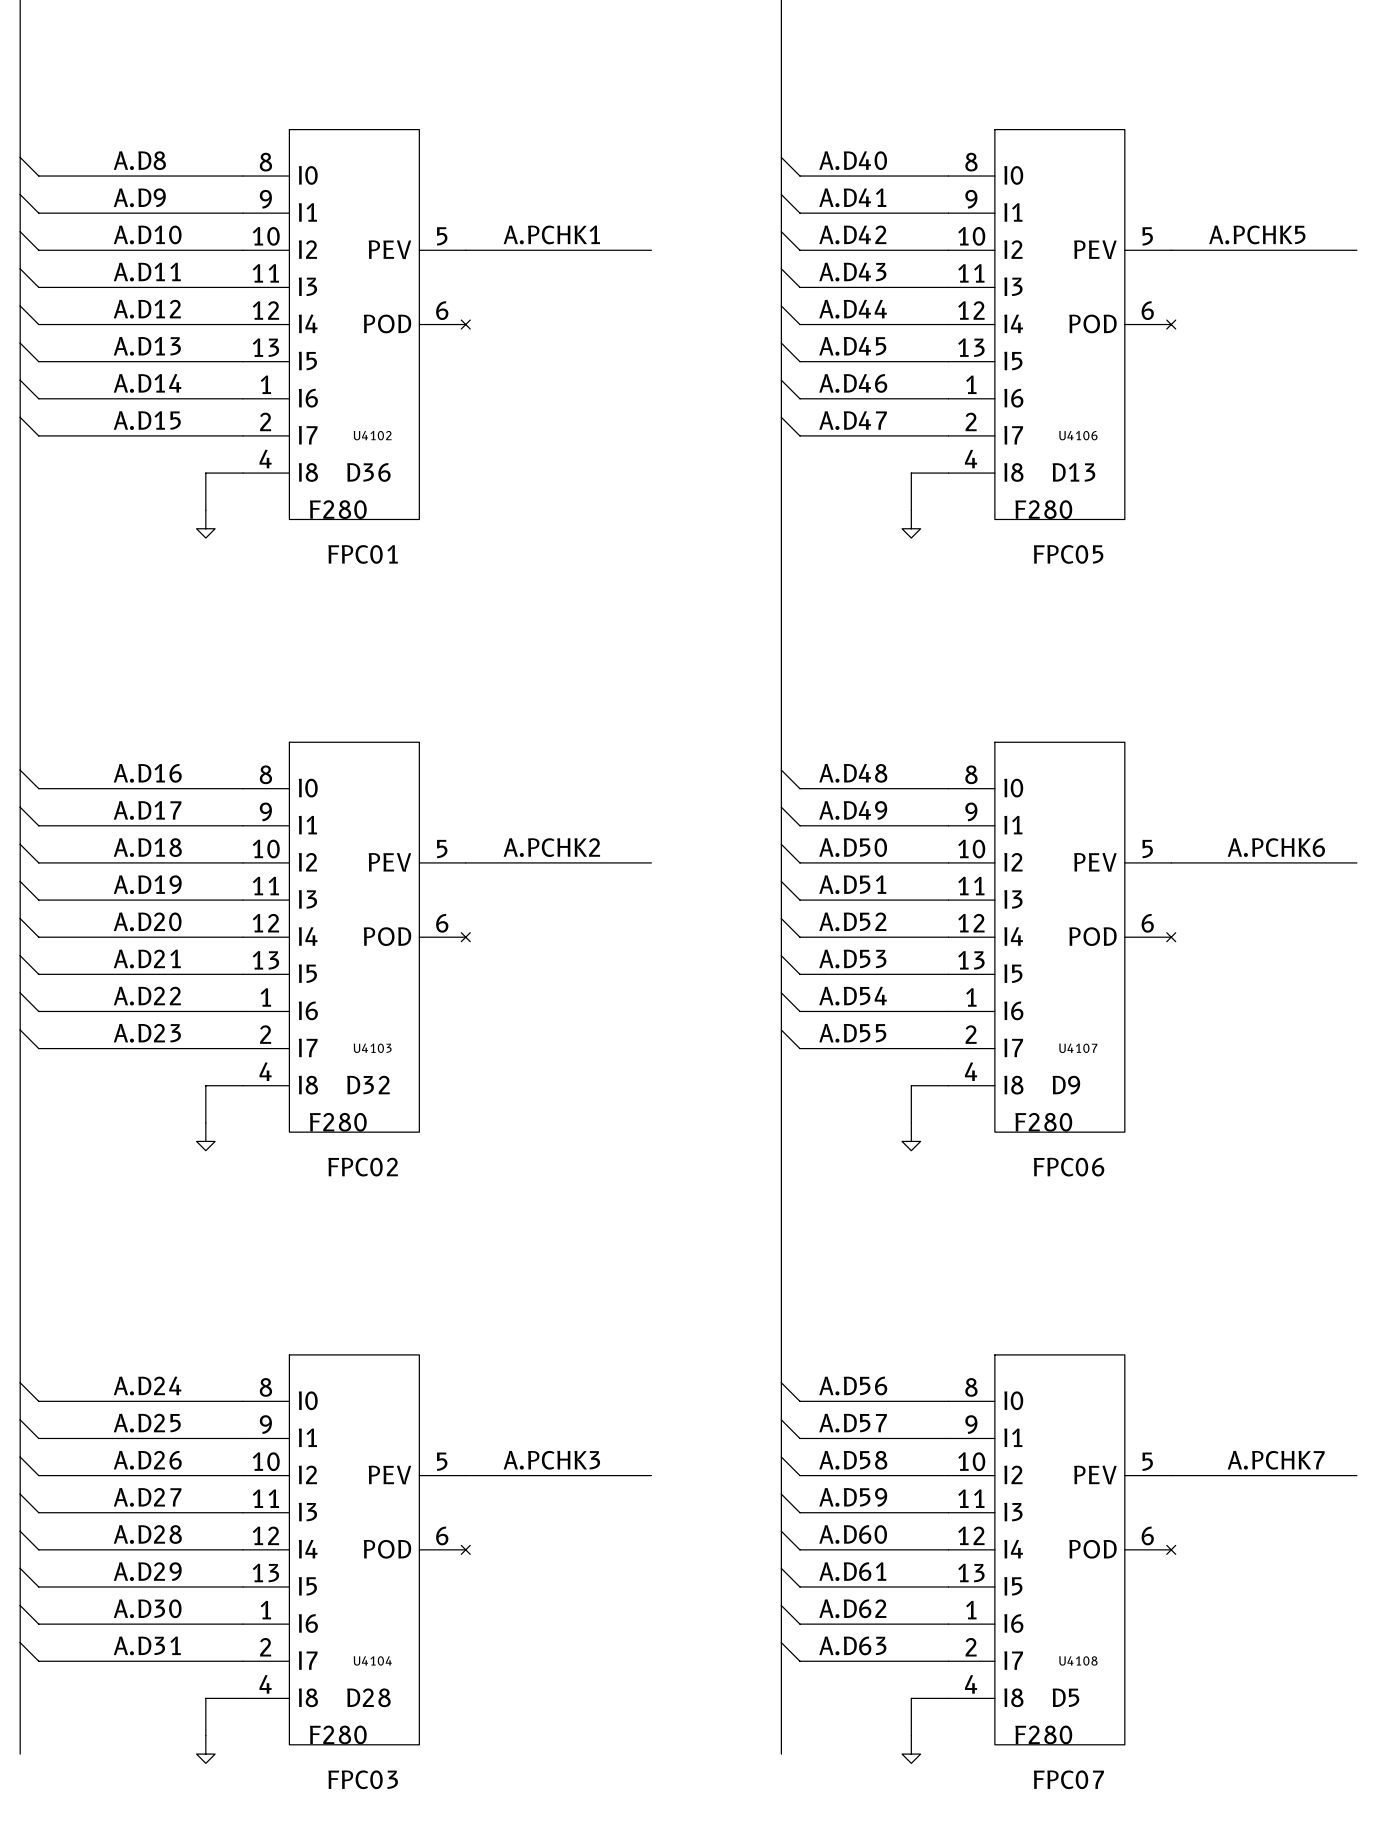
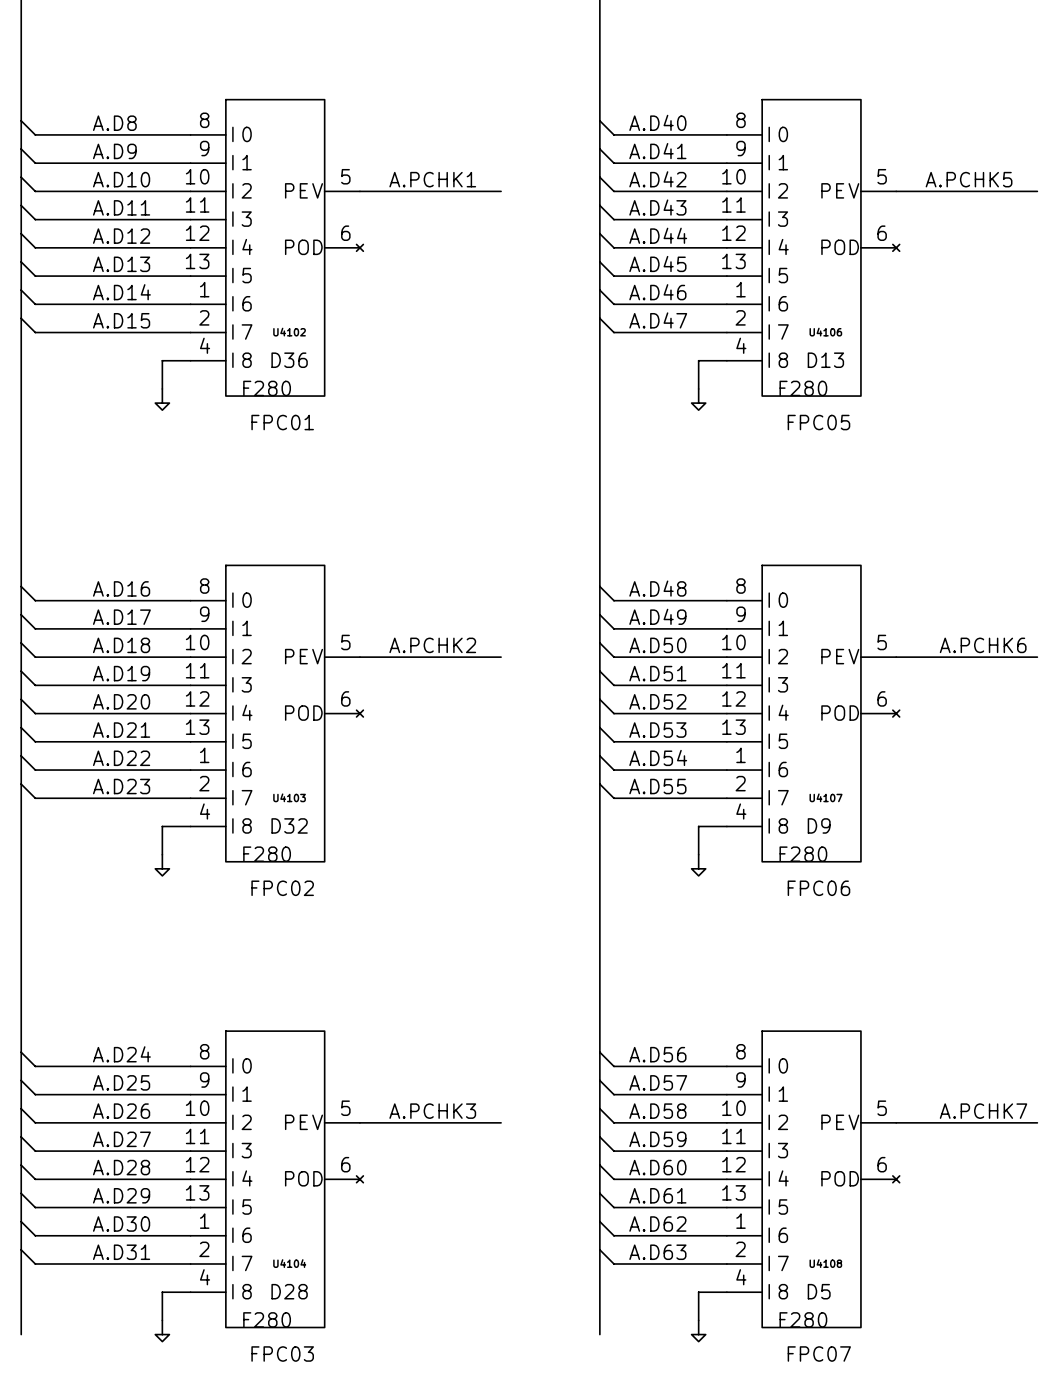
U4102 symbol: [242, 129, 466, 520] -> [190, 99, 360, 397]
U4106 symbol: [948, 129, 1172, 520] -> [726, 99, 897, 397]
U4103 symbol: [242, 742, 466, 1133] -> [190, 565, 360, 862]
U4107 symbol: [948, 742, 1172, 1133] -> [726, 565, 897, 862]
U4104 symbol: [242, 1354, 466, 1745] -> [190, 1031, 360, 1328]
U4108 symbol: [948, 1354, 1172, 1745] -> [726, 1031, 897, 1328]

